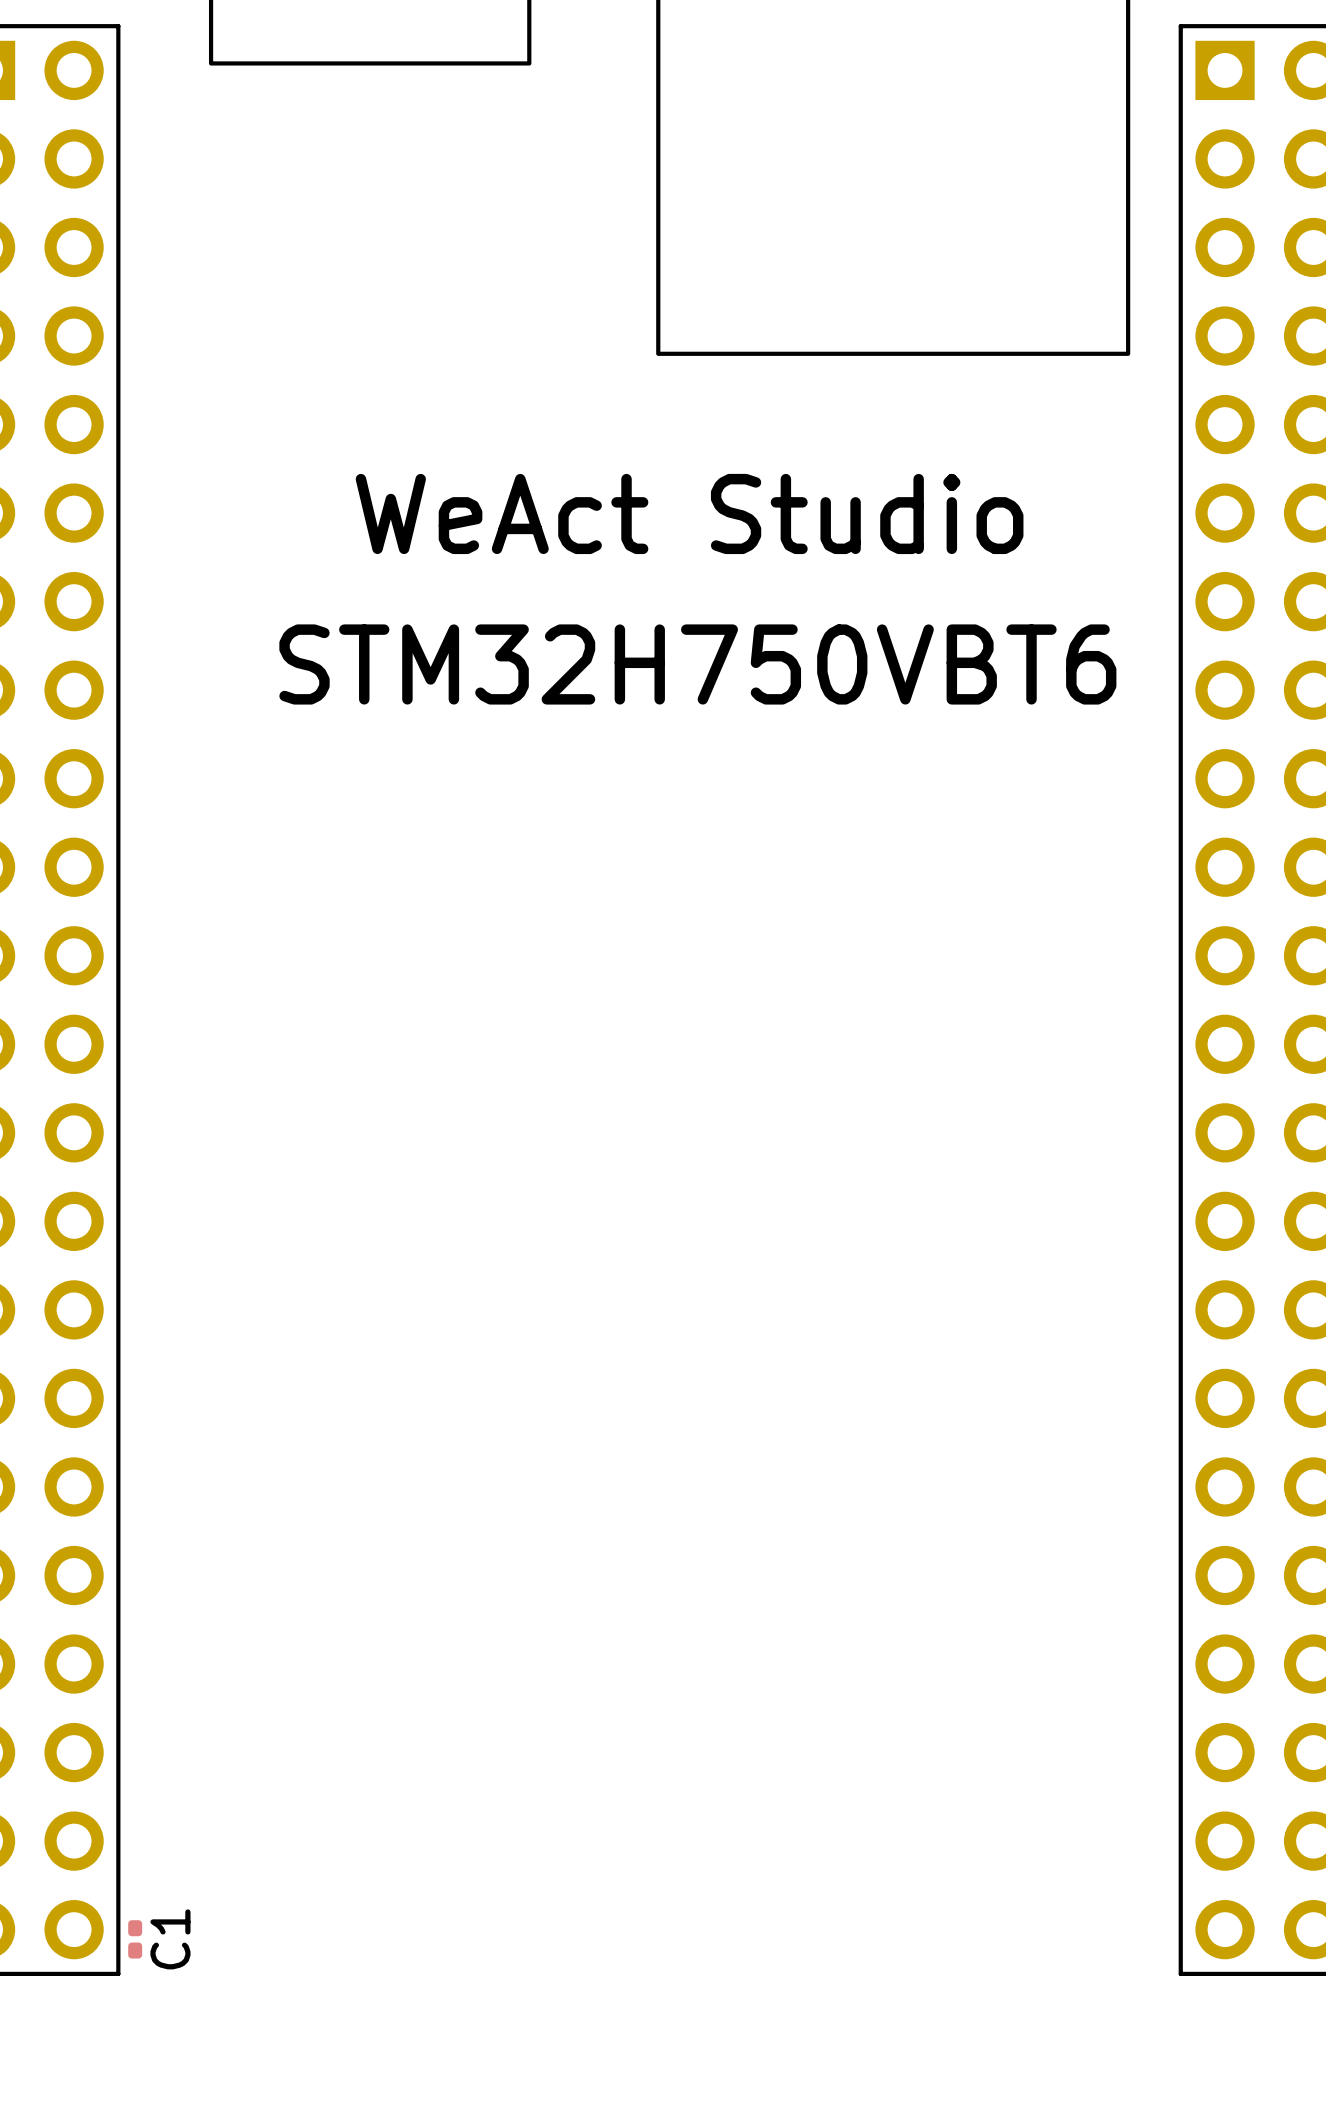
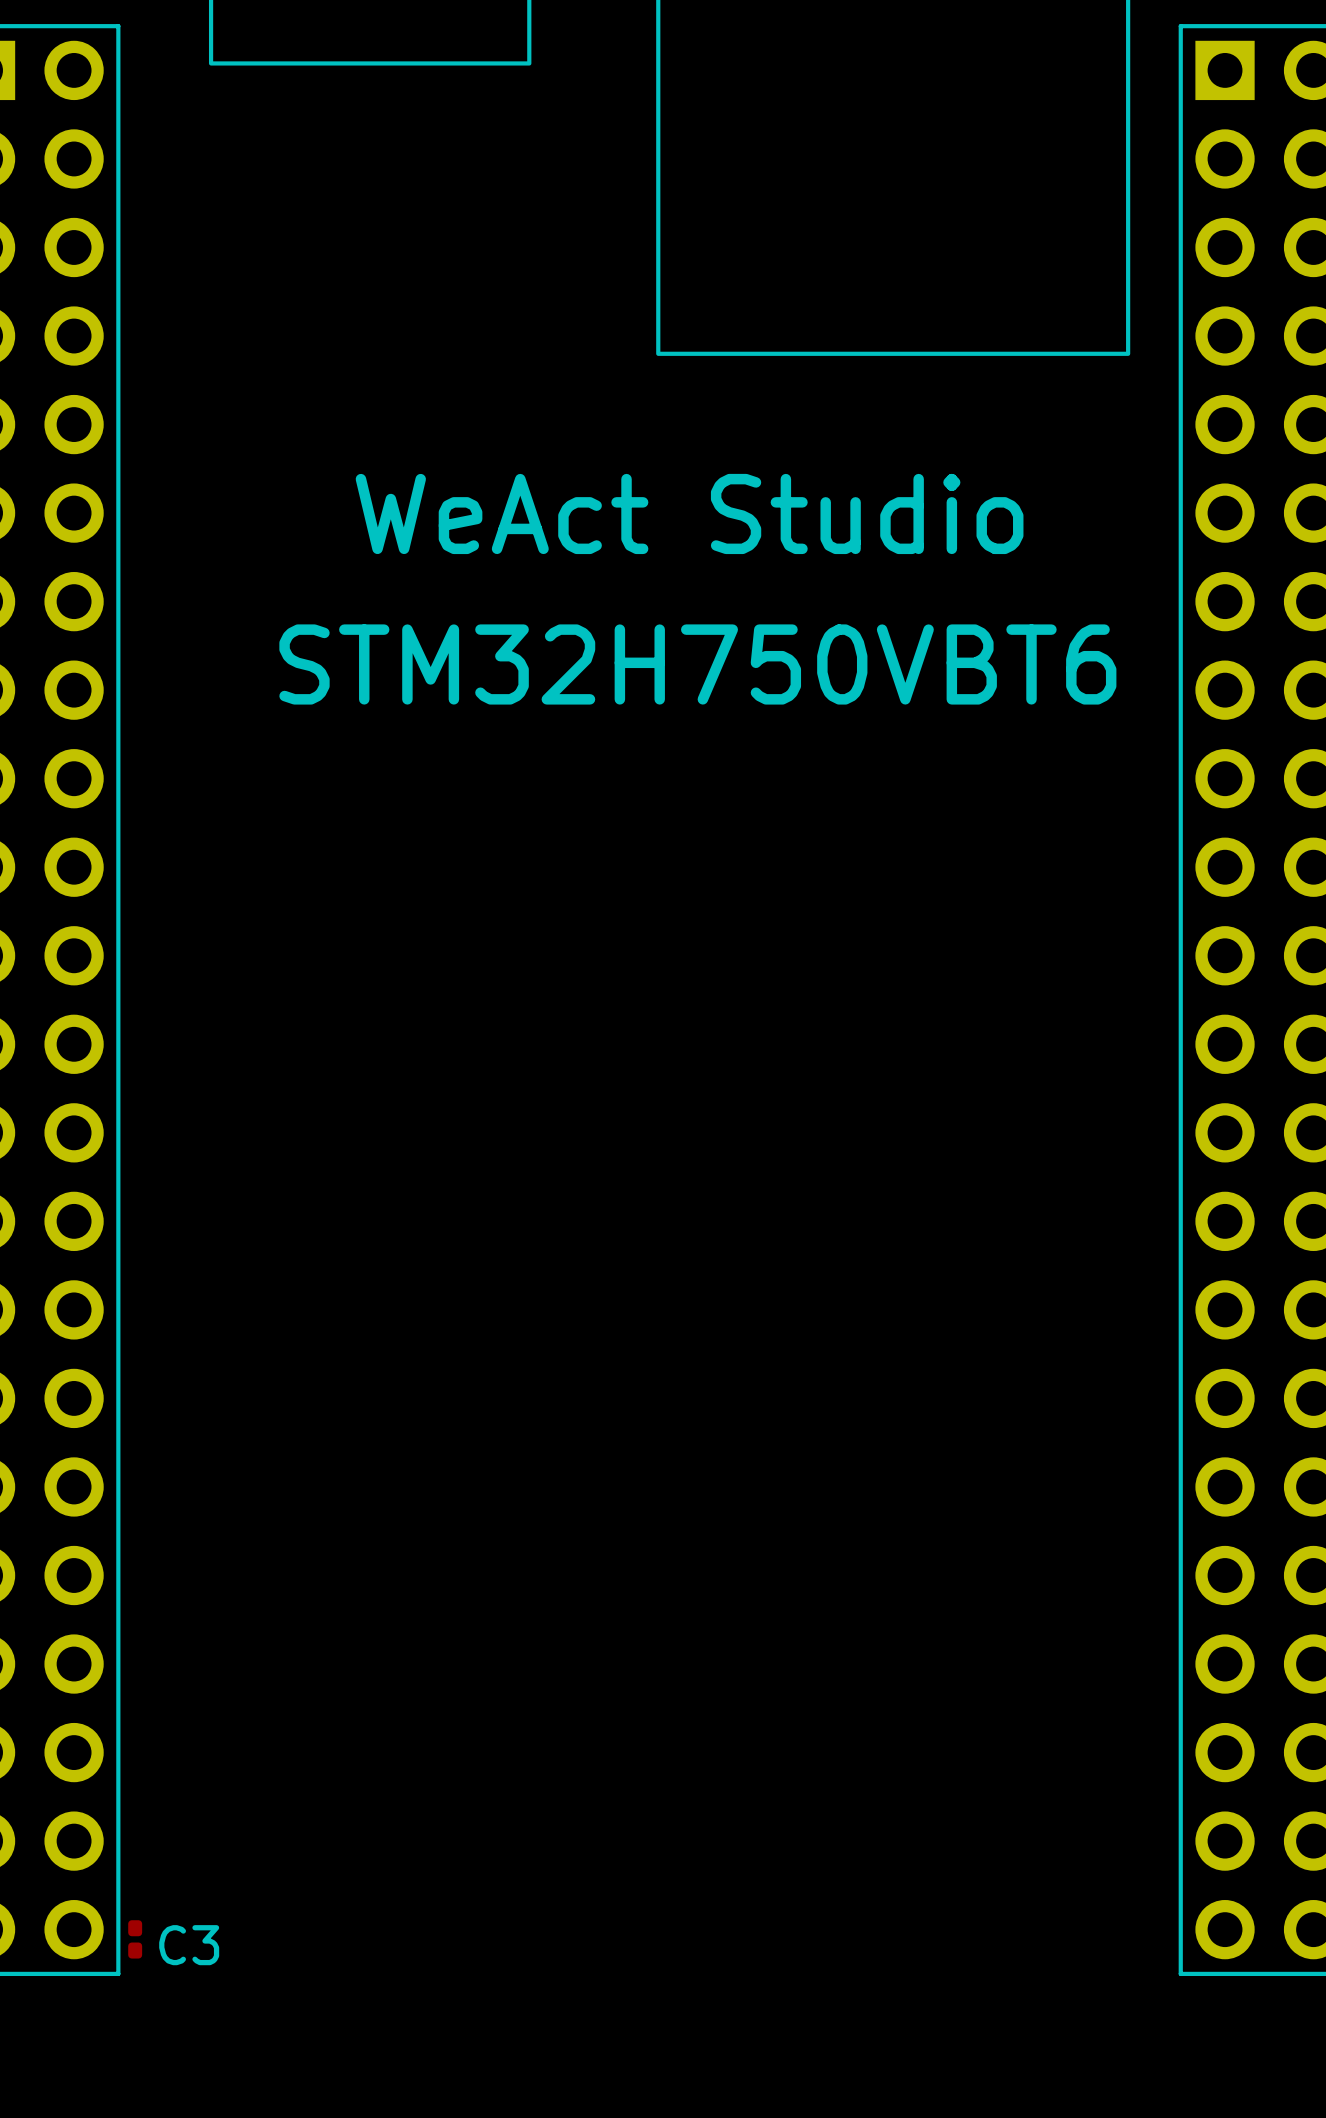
C1 name: C1 (170, 1939) -> C3 (189, 1945)

